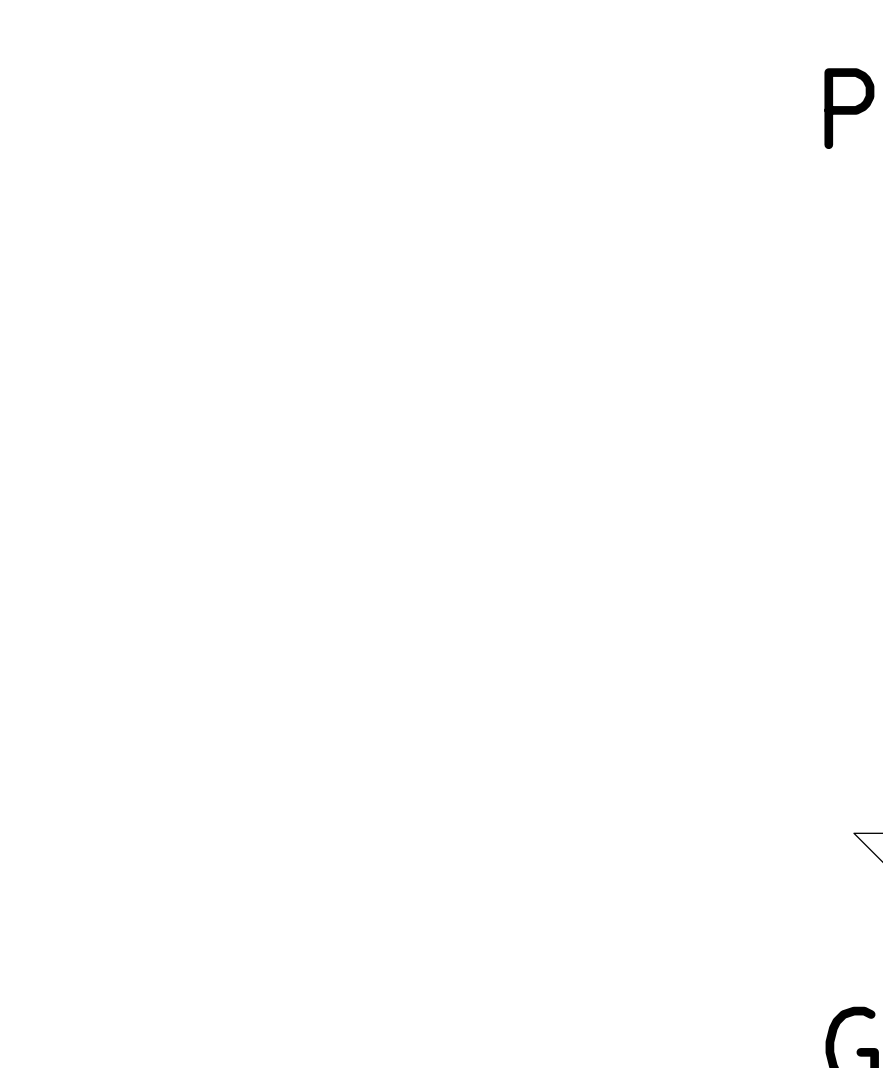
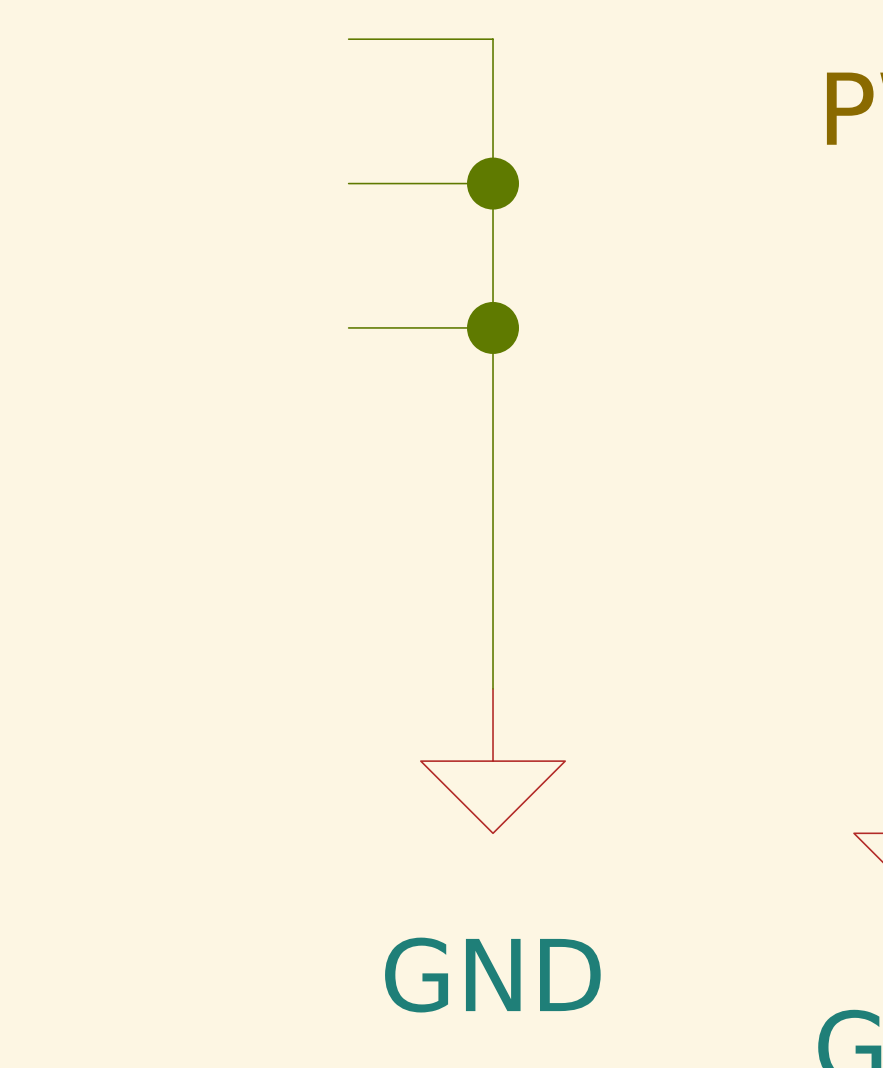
wire: none -> (348, 39) (493, 39) (493, 688)
wire: none -> (348, 183) (493, 183)
junction: none -> (493, 183)
wire: none -> (348, 327) (493, 327)
junction: none -> (493, 327)
power symbol: none -> GND (493, 761)

